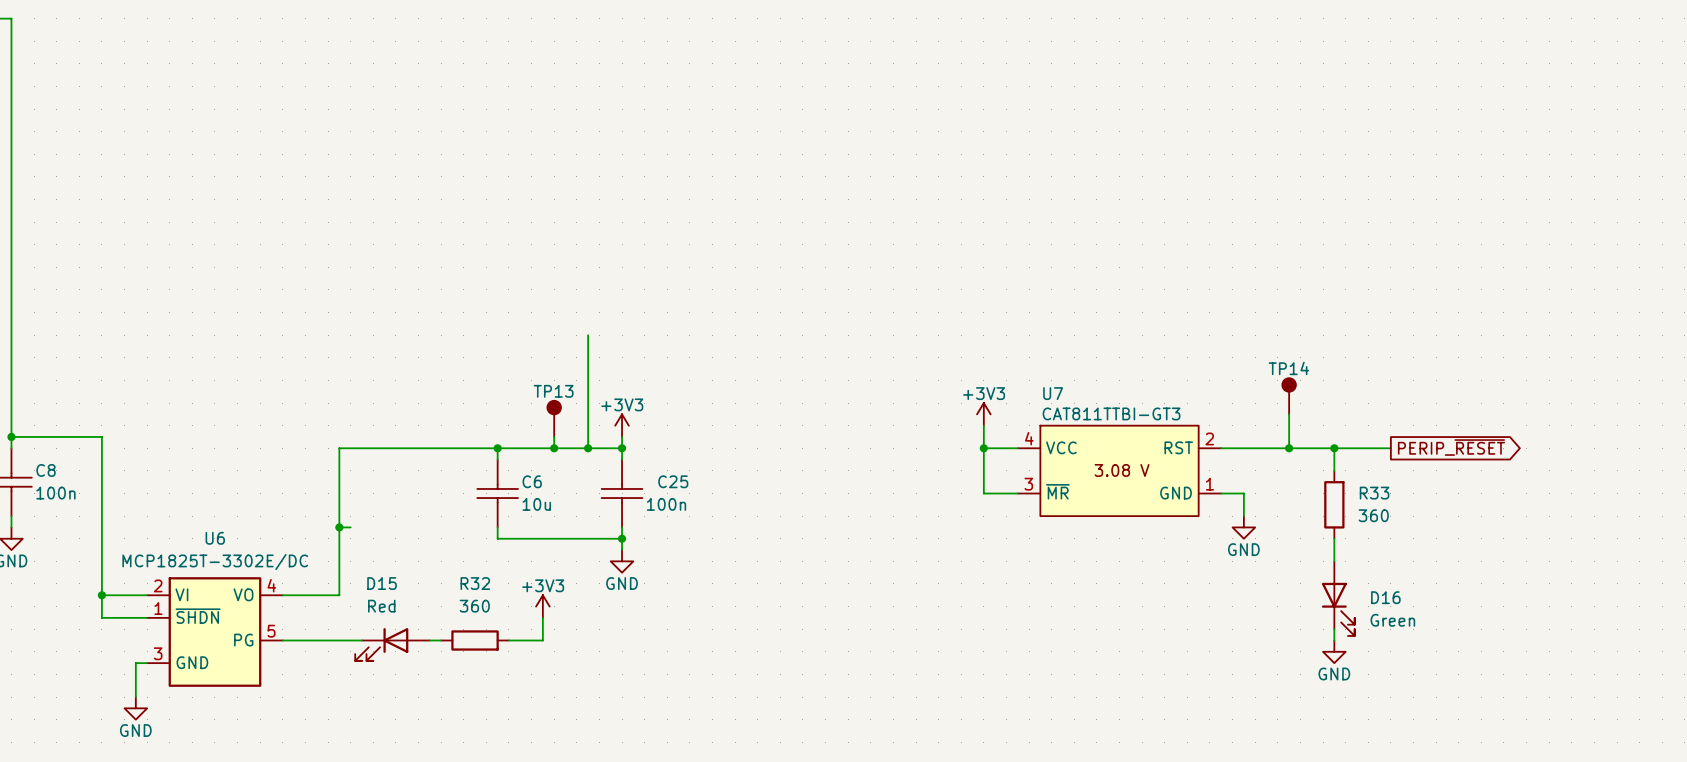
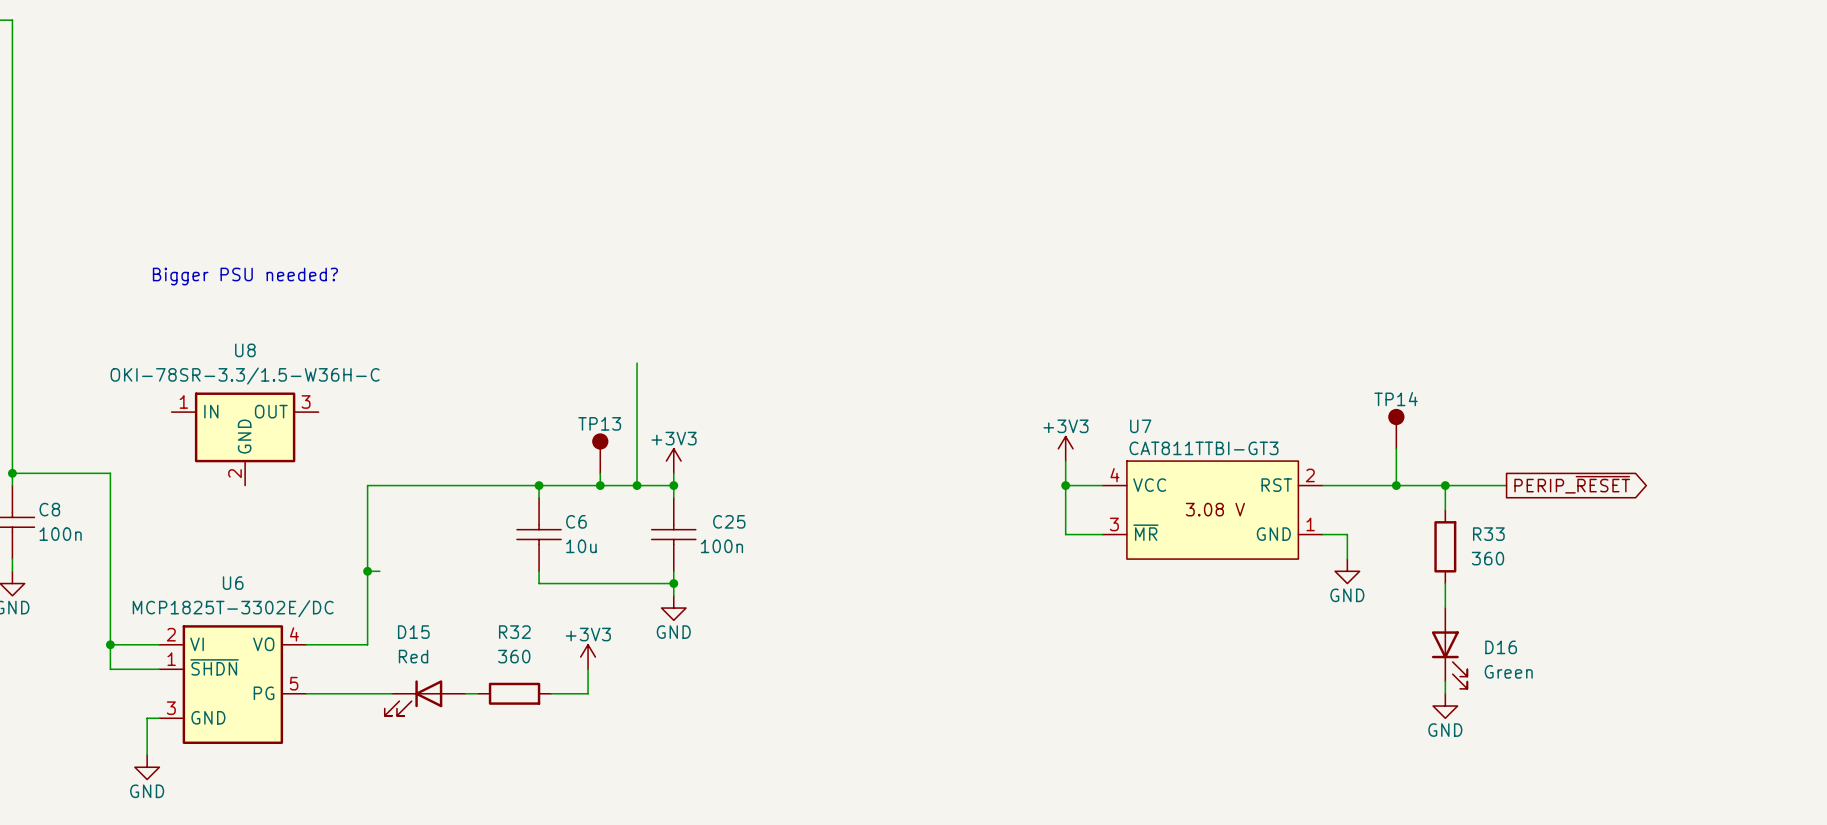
text: none -> Bigger PSU needed? (245, 276)
U8: none -> (245, 439)

